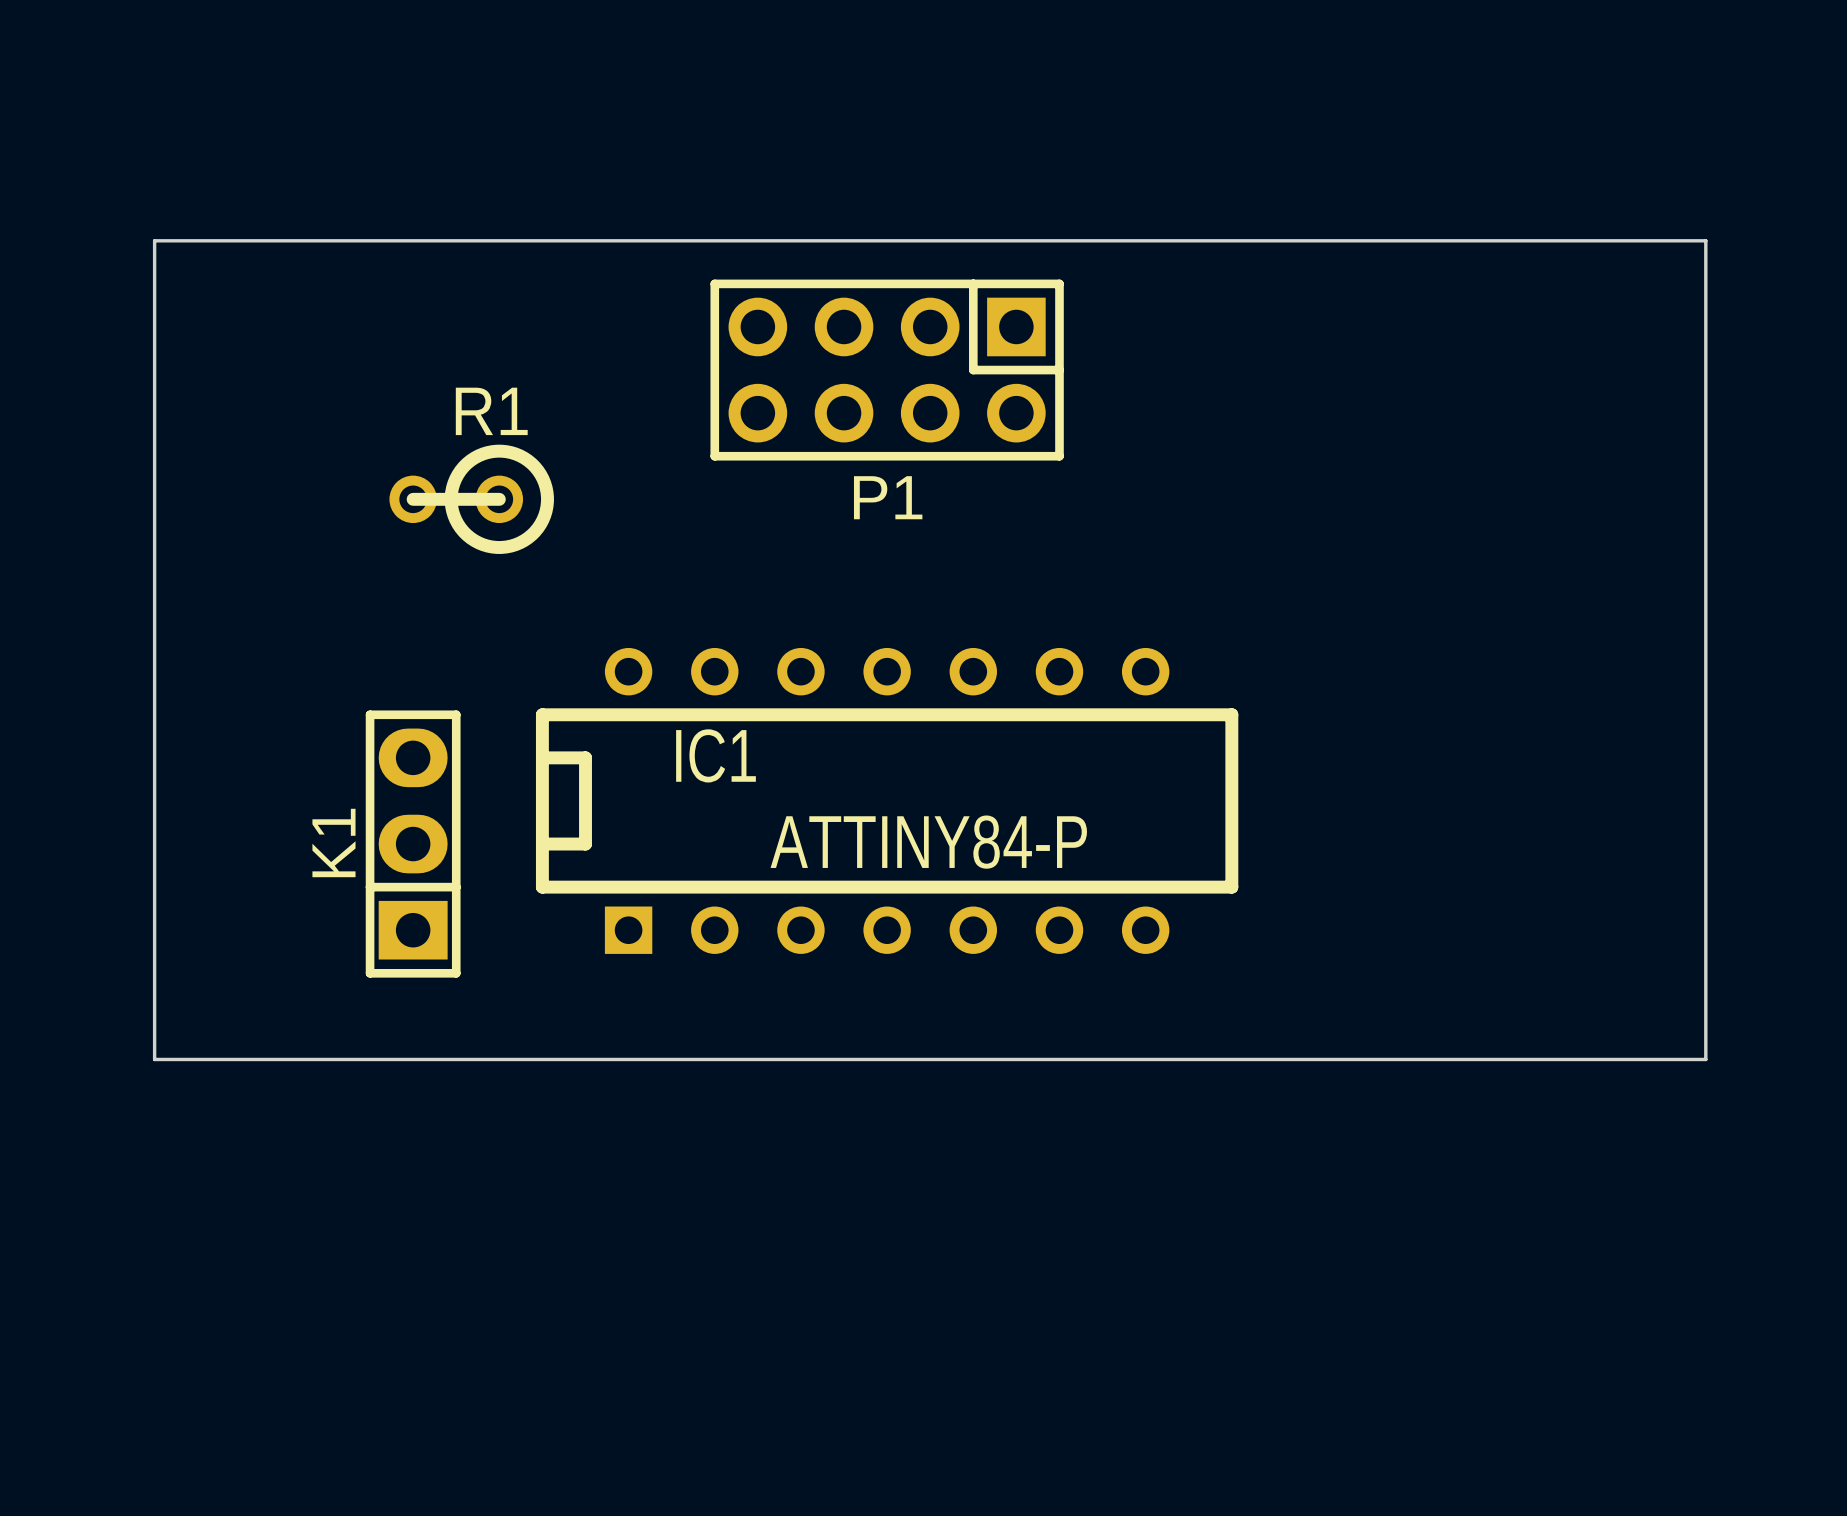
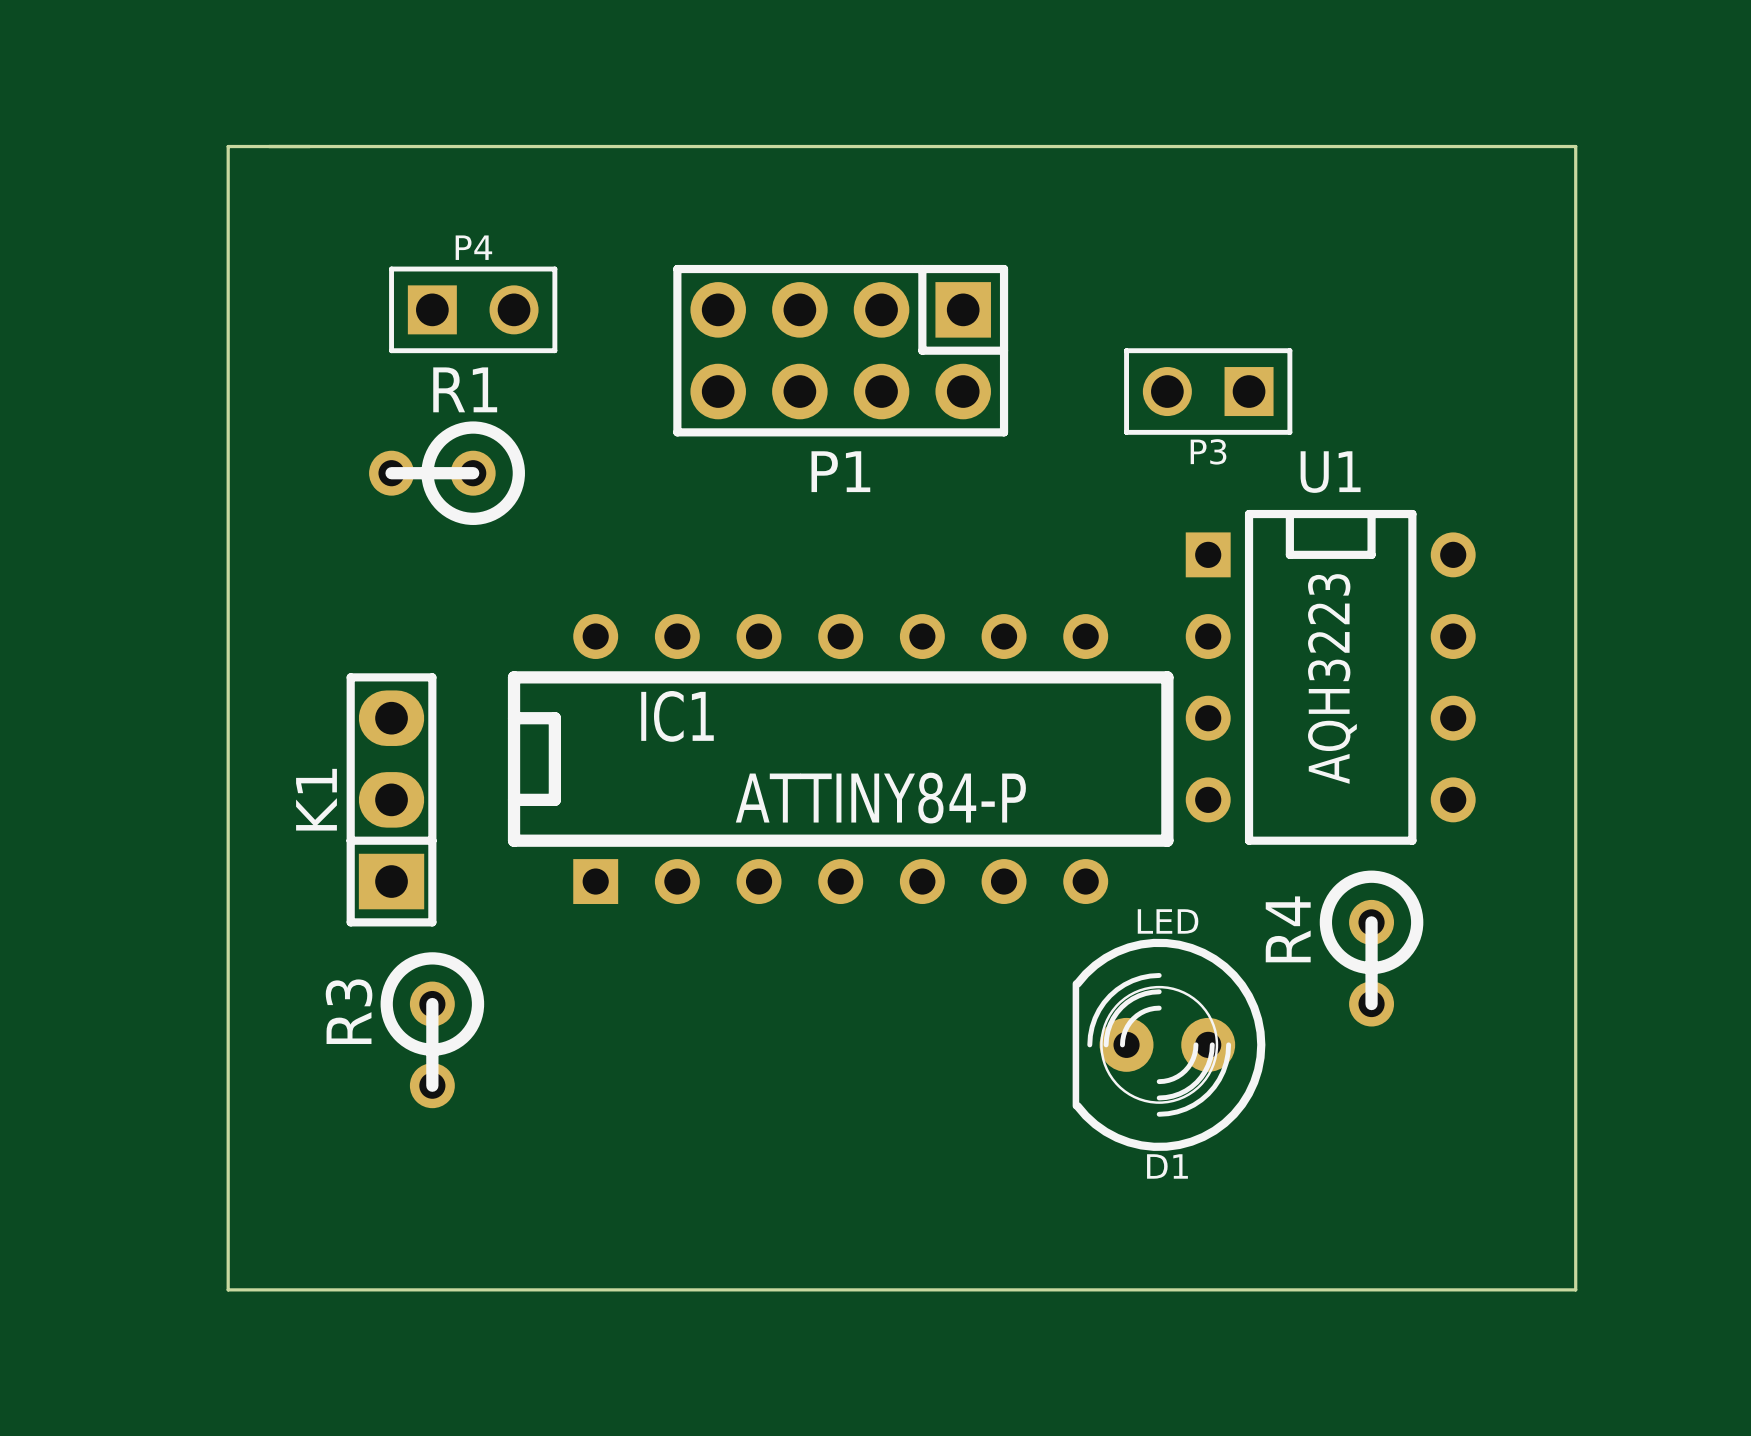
board edge: (154, 240) (154, 1059) (1705, 1059) (1705, 240) (154, 240) -> (228, 146) (228, 1289) (1575, 1289) (1575, 146) (228, 146)
P4: none -> (473, 309)
P3: none -> (1208, 391)
U1: none -> AQH3223 (1330, 677)
R4: none -> (1371, 948)
R3: none -> (432, 1030)
D1: none -> LED (1169, 1044)

